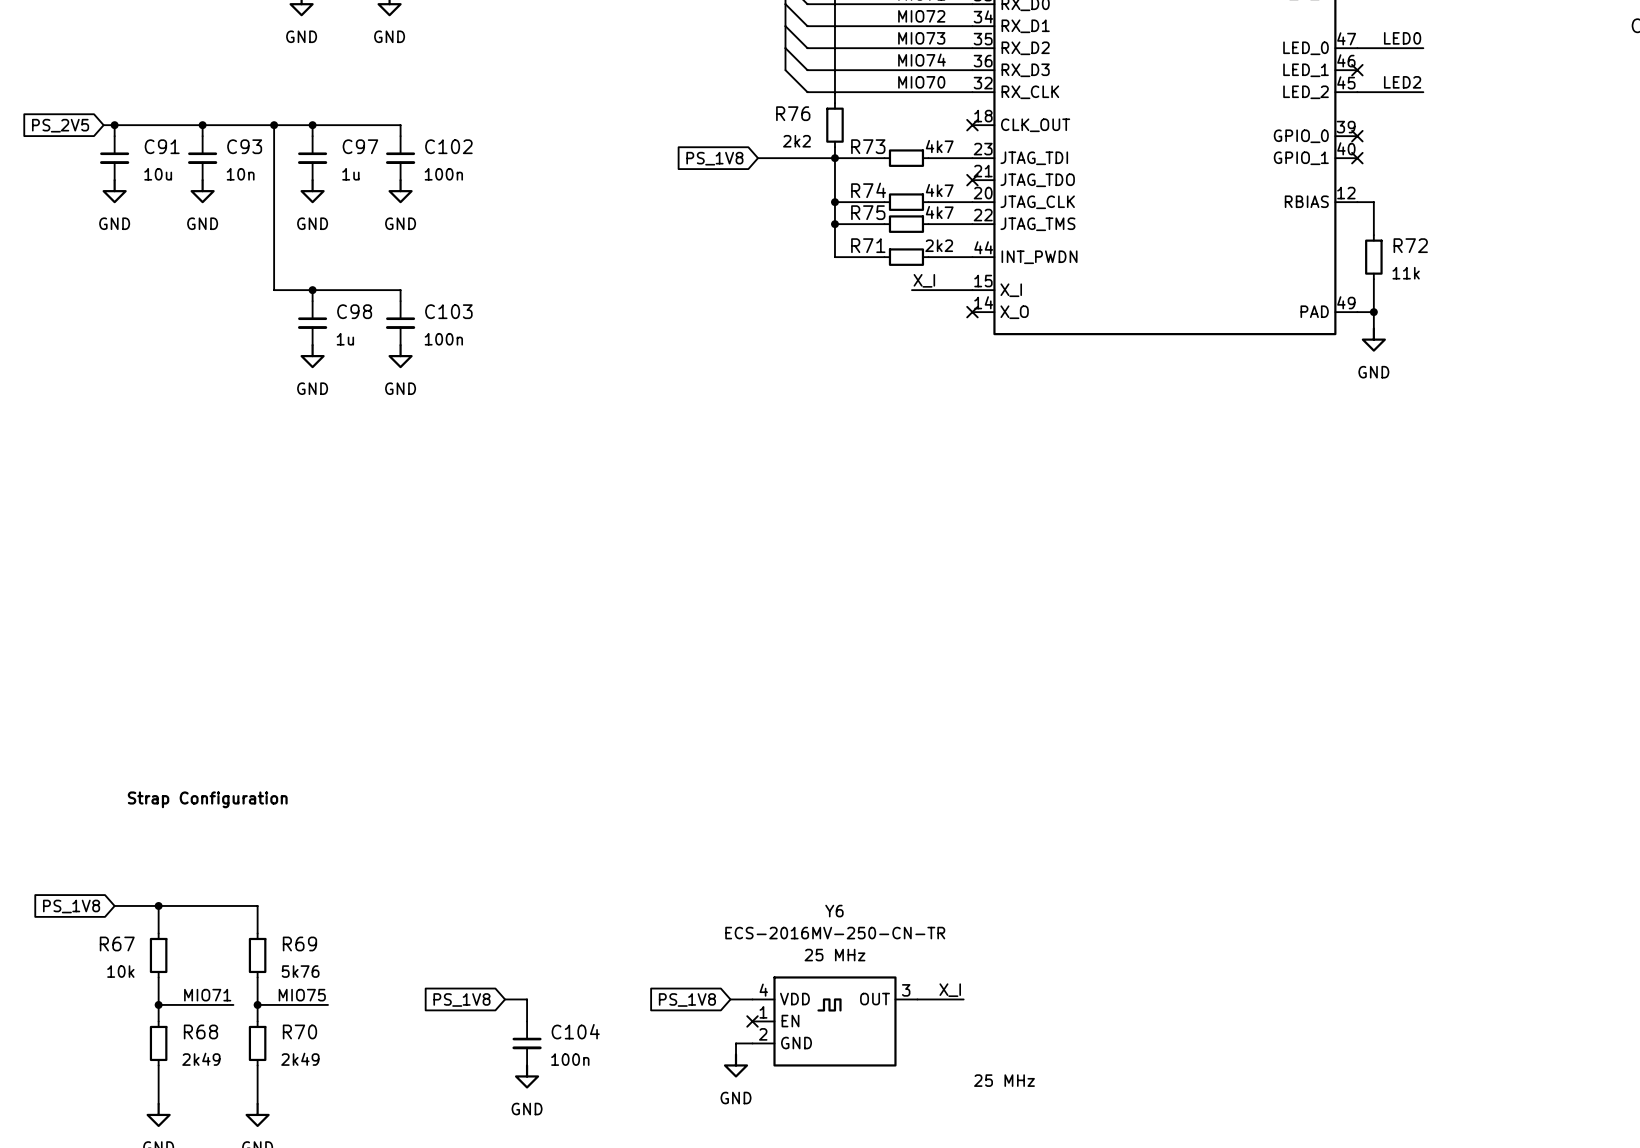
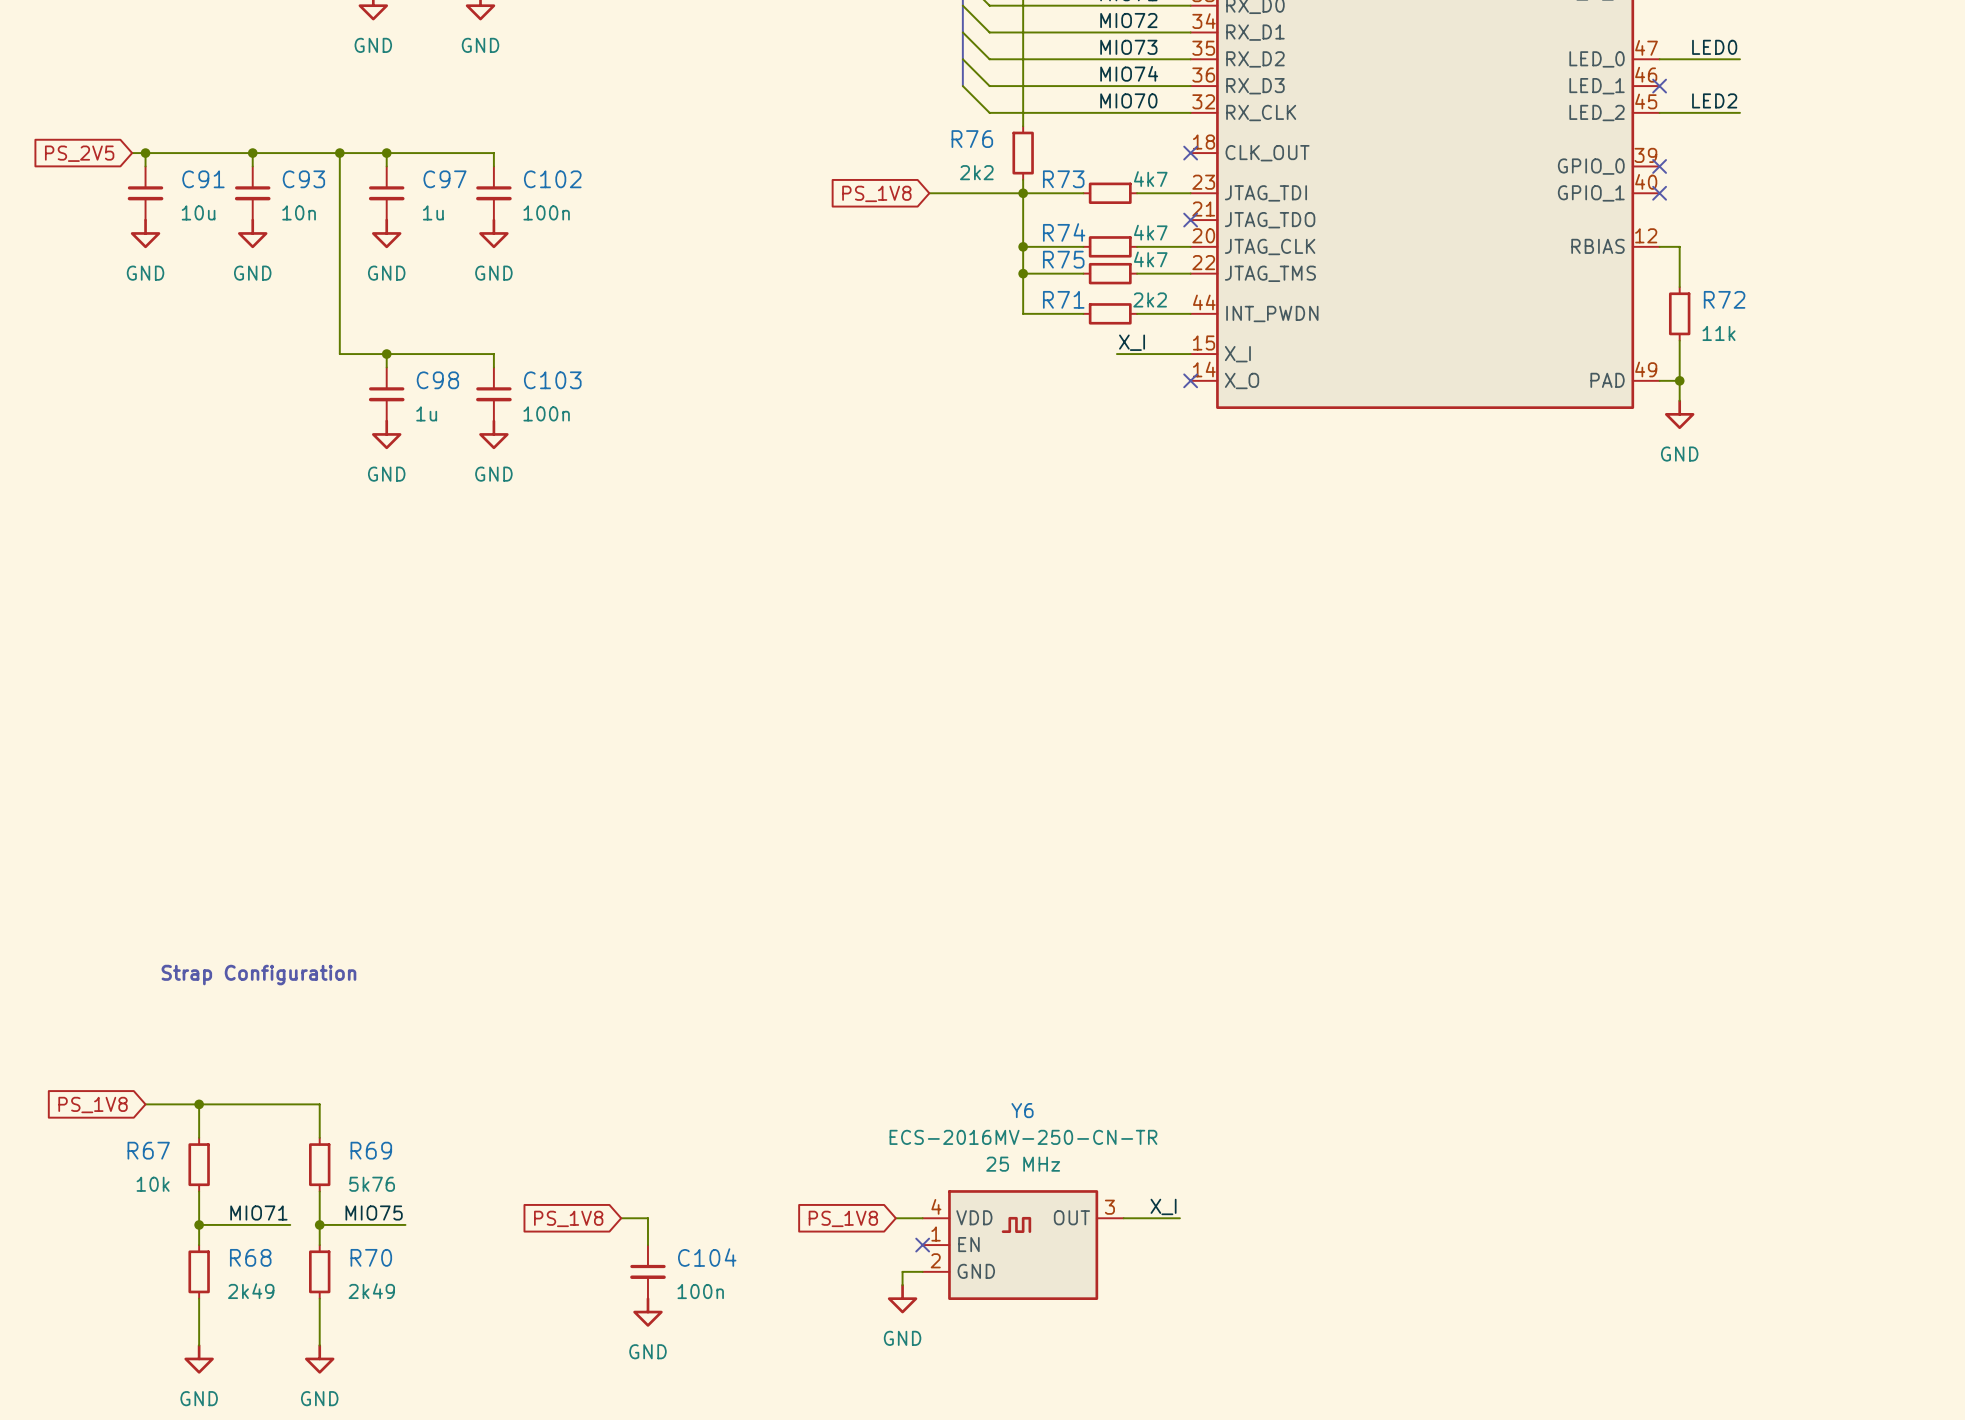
Y6 text: 25 MHz (1004, 1080) -> none

